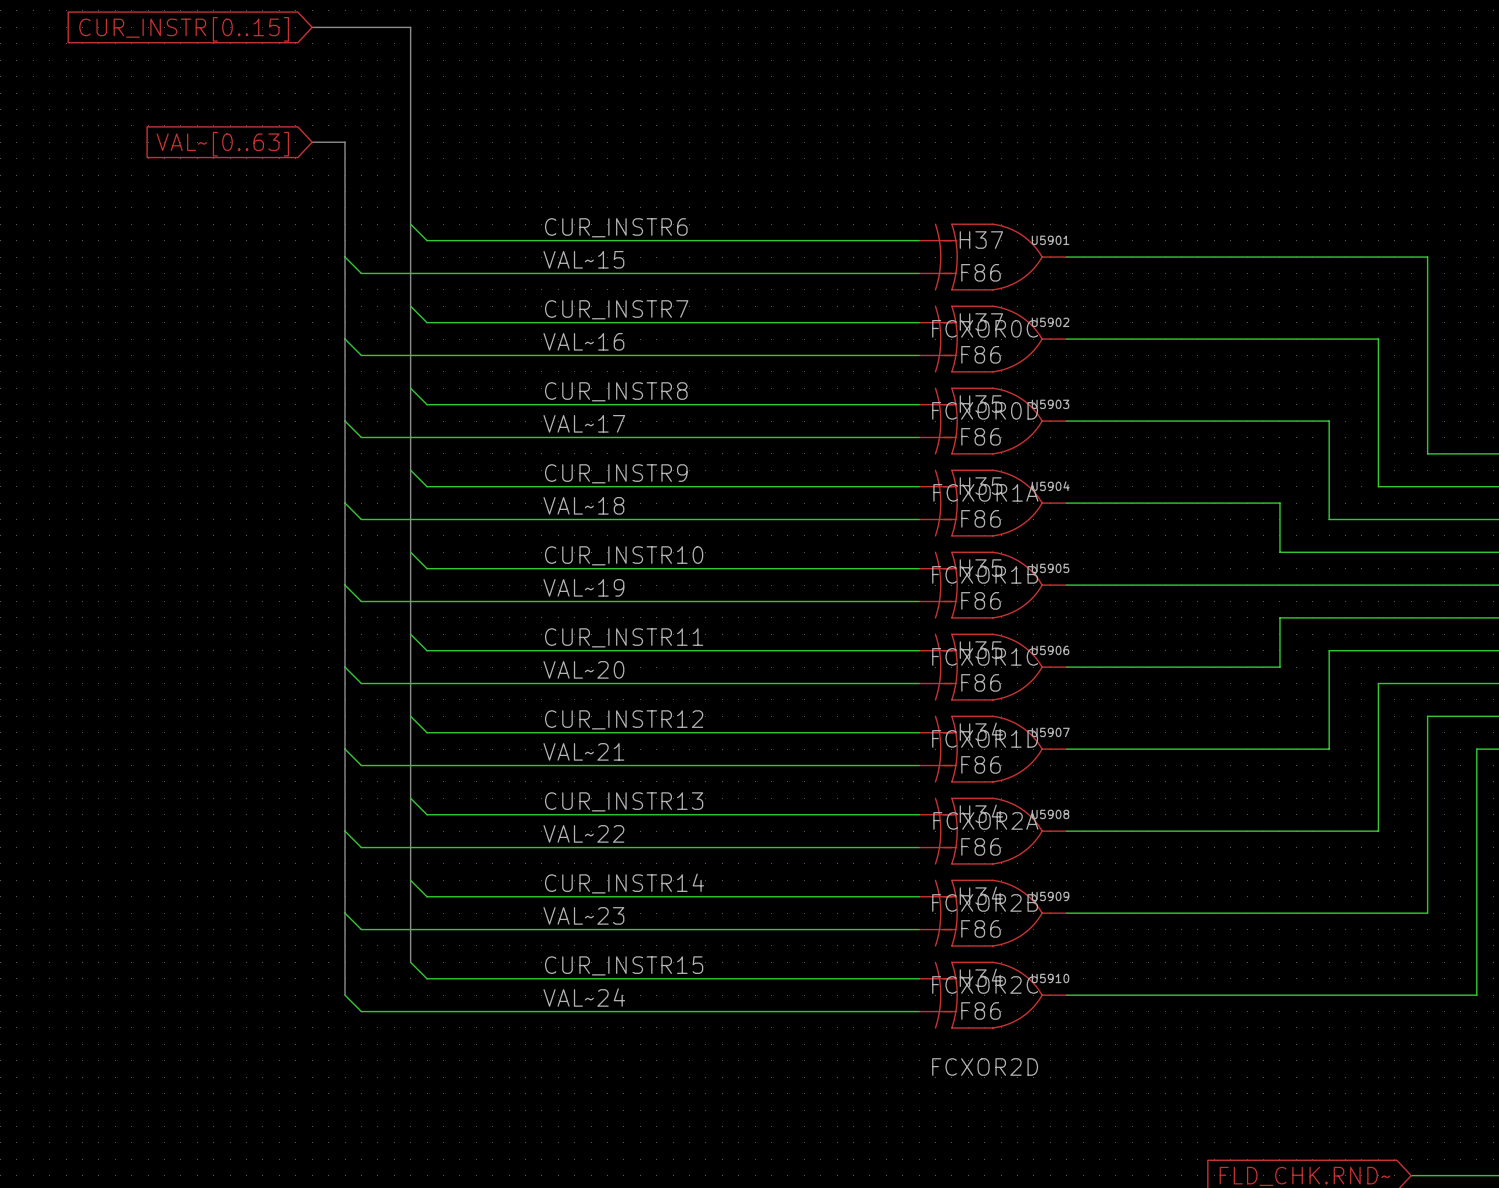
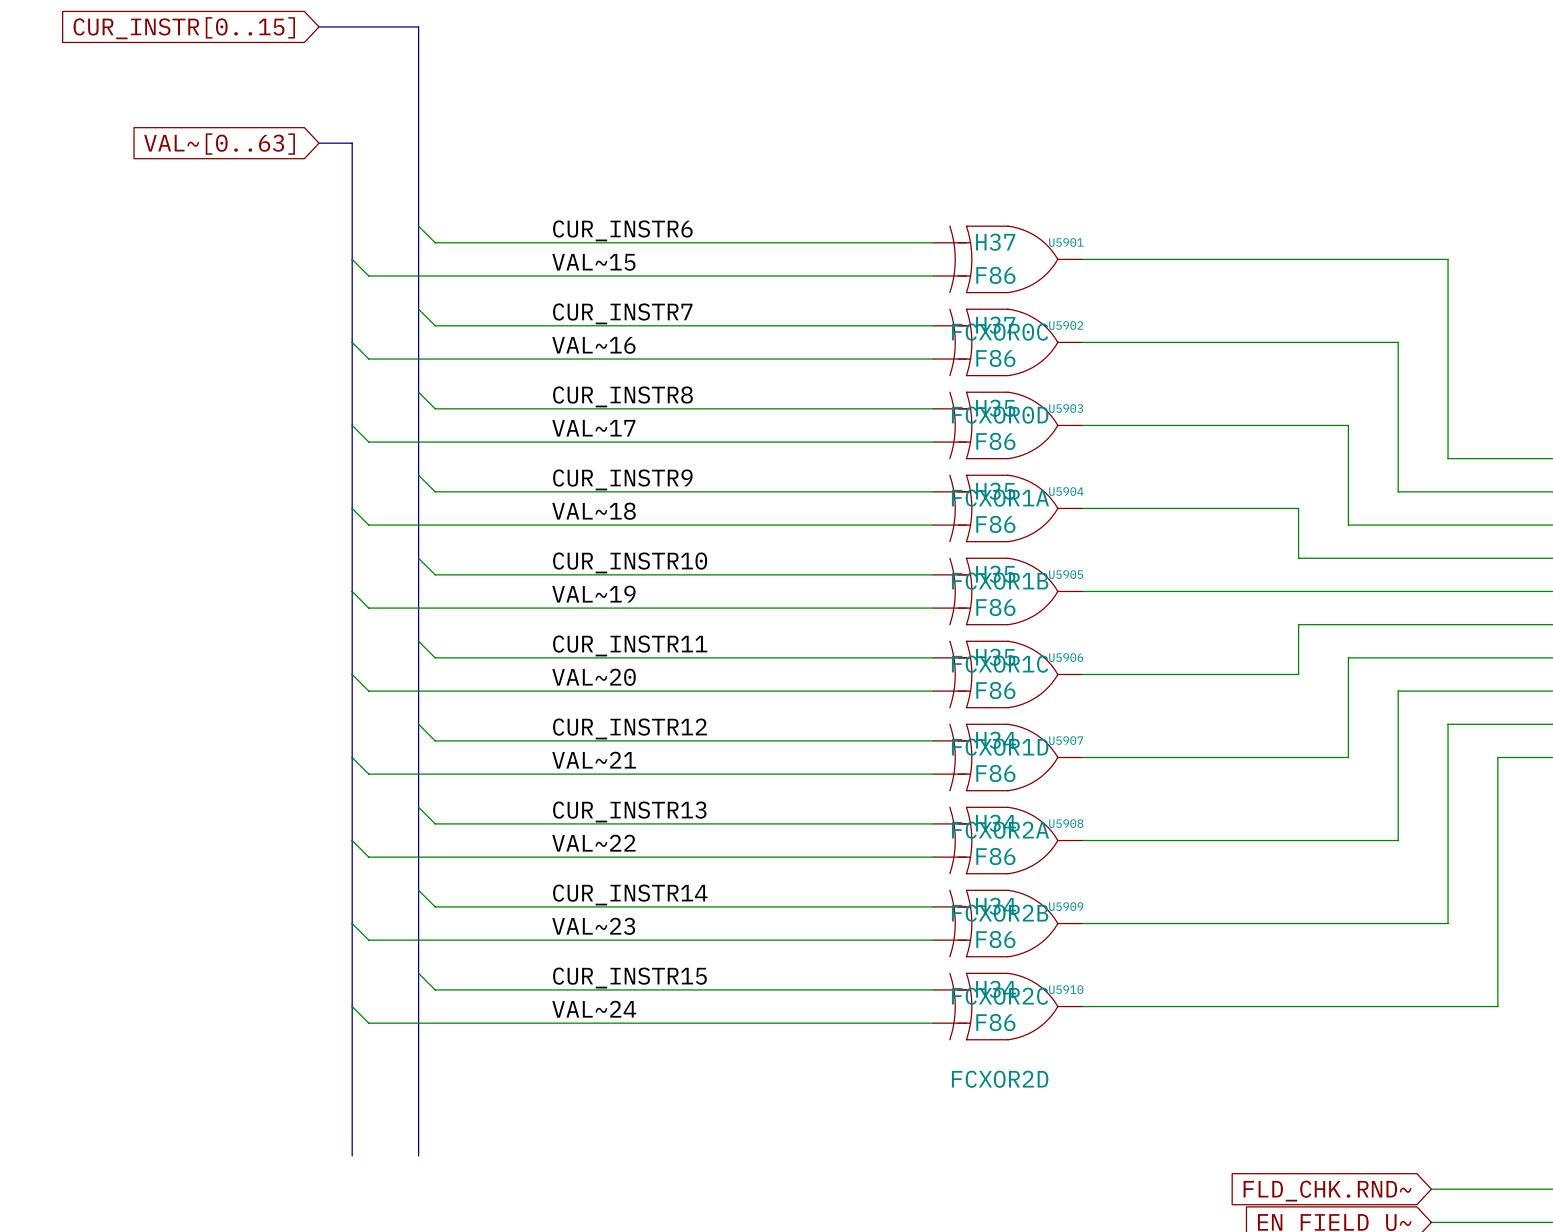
bus: none -> (418, 973) (418, 1155)
bus: none -> (352, 1006) (352, 1155)

